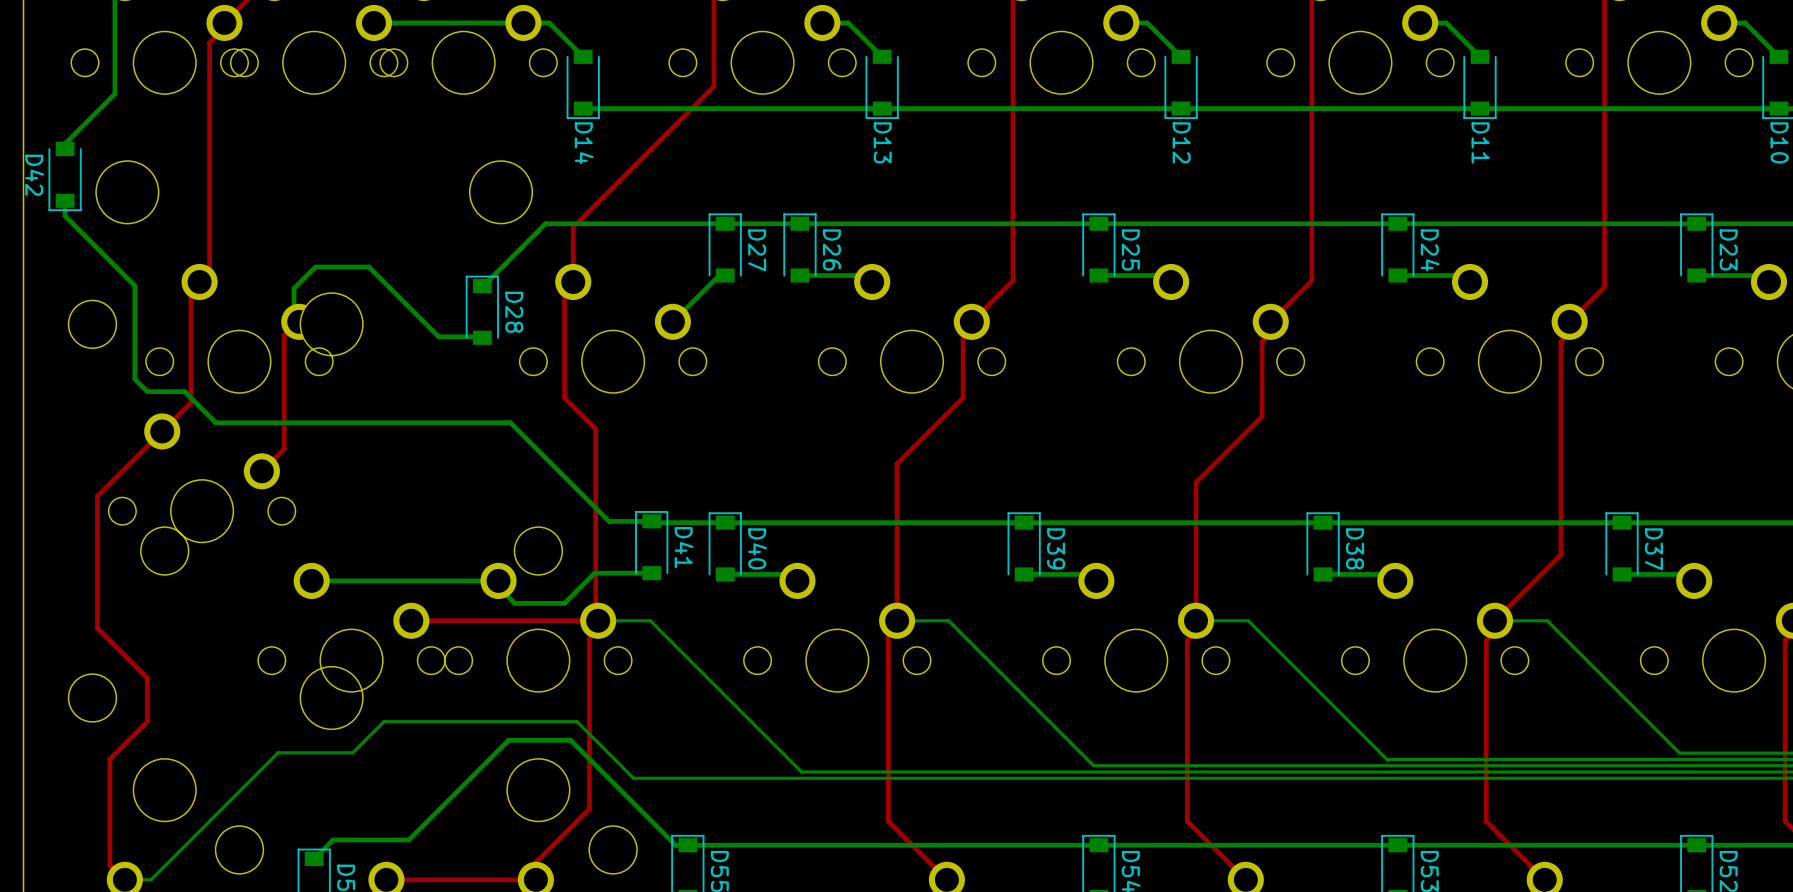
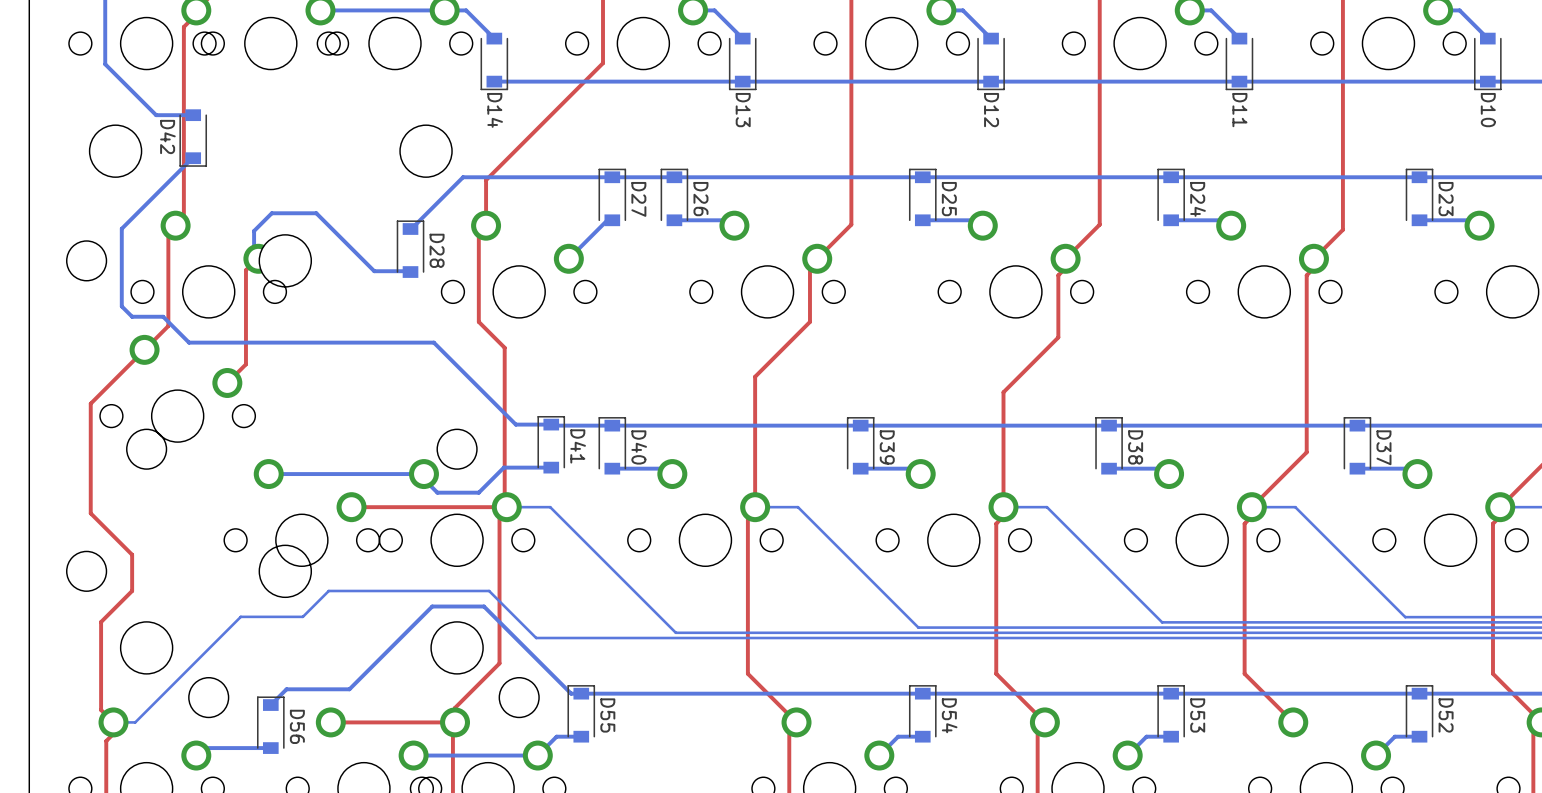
bottom track: (114, 87) (114, 93) (65, 143) (65, 148) -> (105, 64) (156, 115) (193, 115)
D42 position: (65, 176) -> (193, 138)
bottom track: (65, 200) (65, 215) (134, 285) -> (192, 158) (121, 228)

